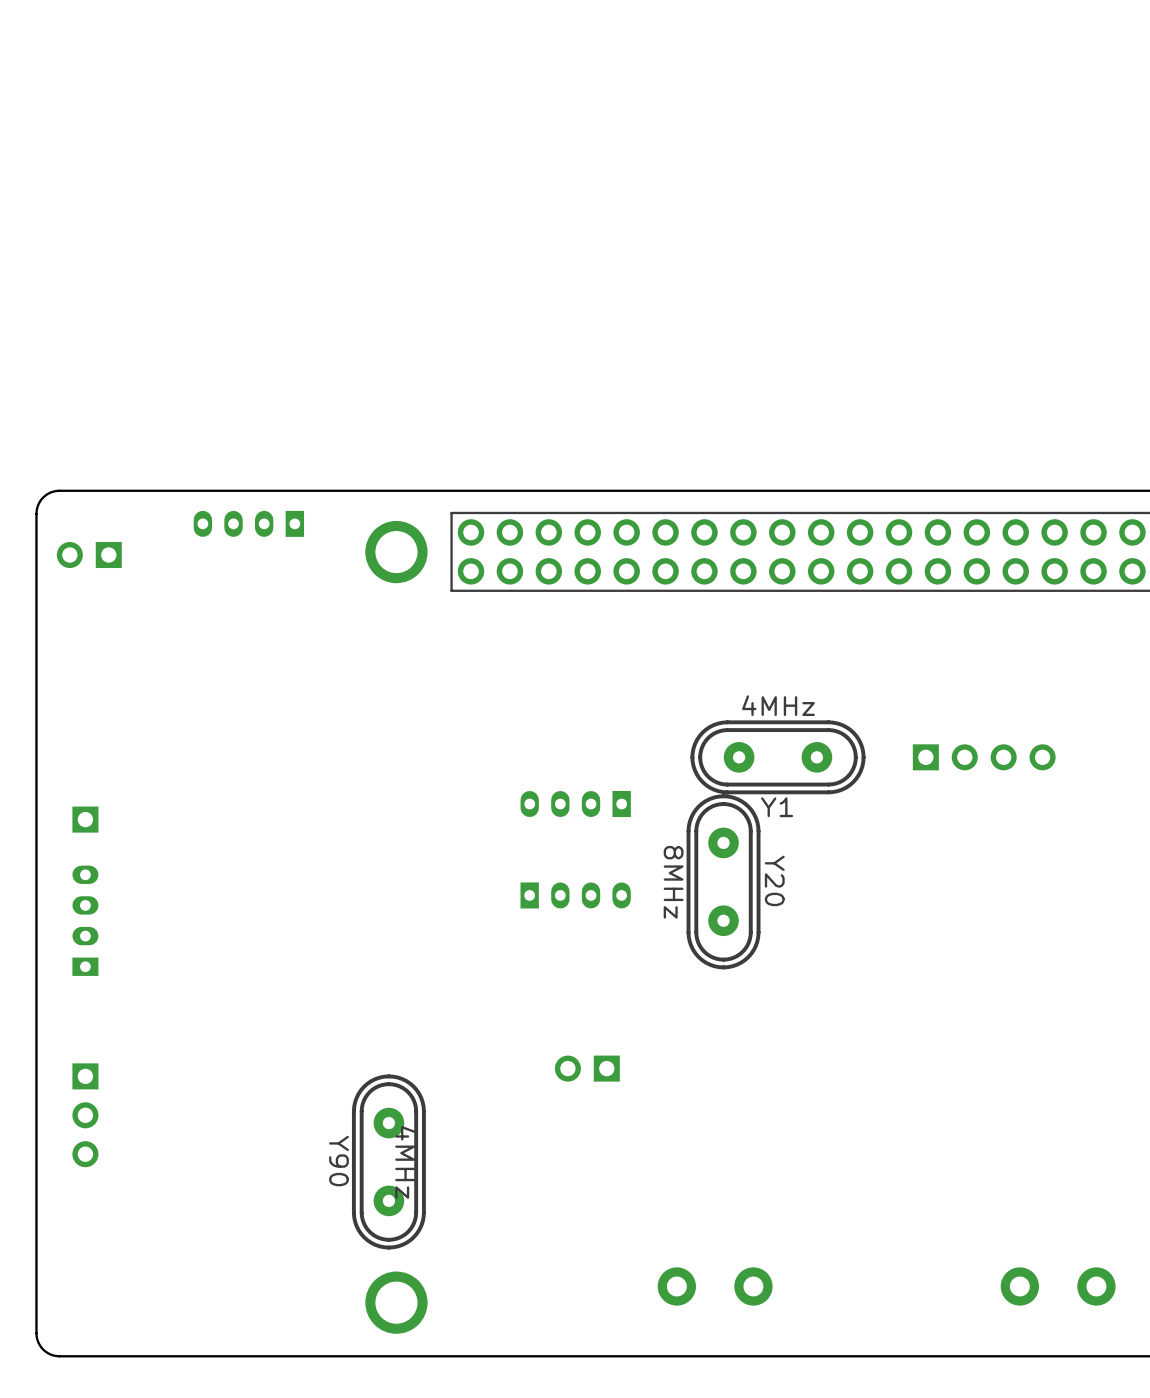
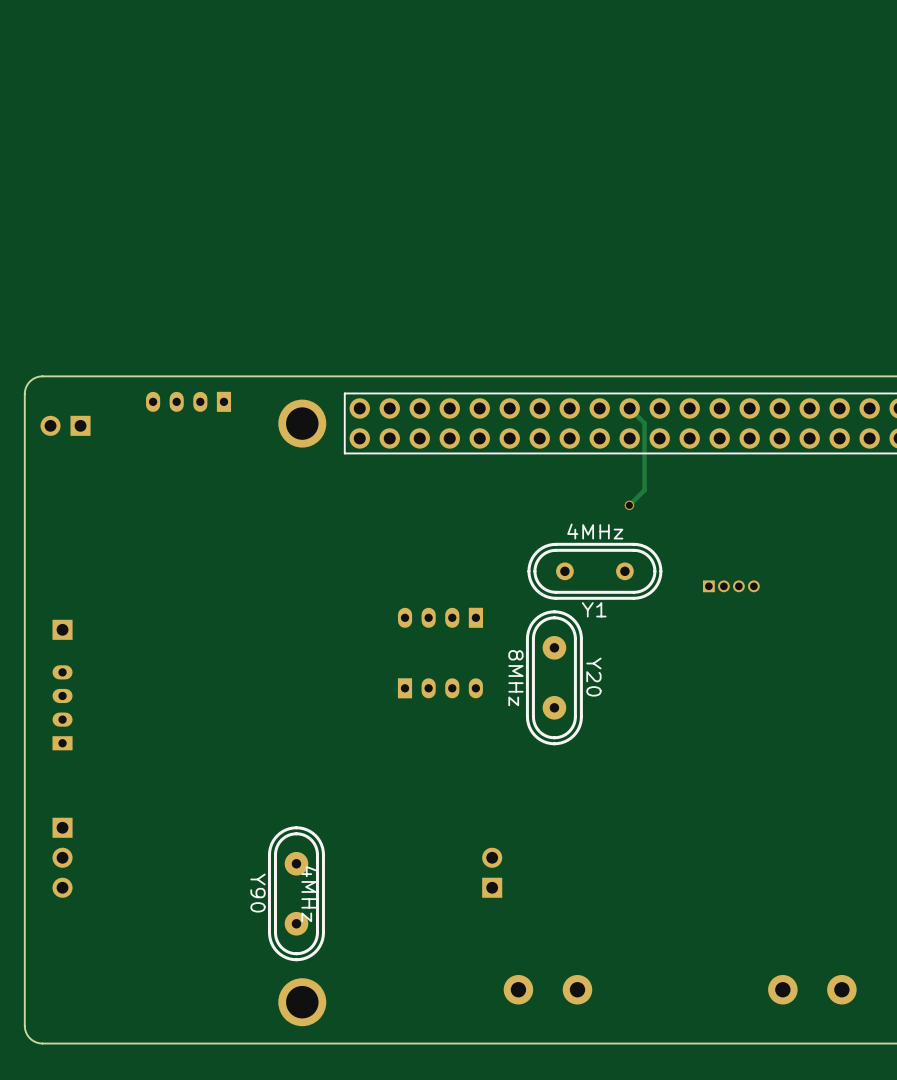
track: none -> (629, 408) (644, 423) (644, 490) (629, 505)
via: none -> (629, 505)
Y1 footprint: [690, 720, 866, 795] -> [527, 542, 663, 600]
part: (984, 757) -> none
part: none -> (731, 586)
part rotation: 0° (587, 1068) -> 90° clockwise (492, 872)
part position: (587, 1068) -> (492, 872)

